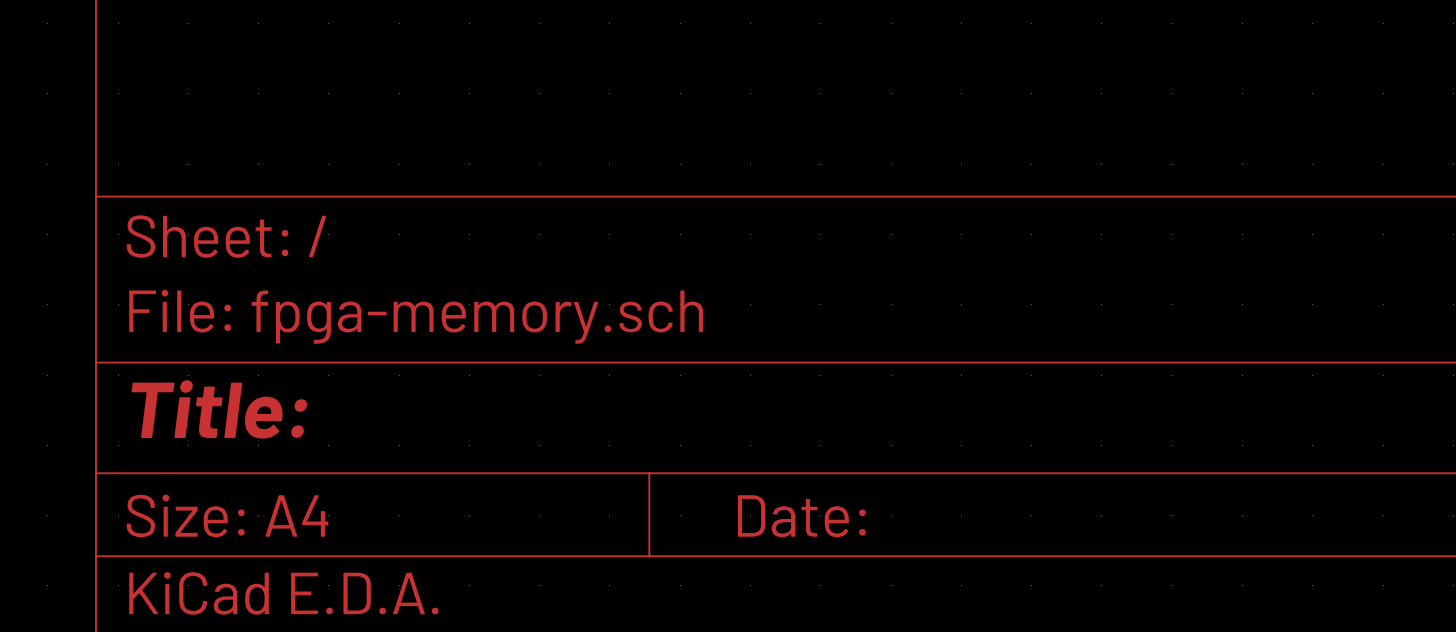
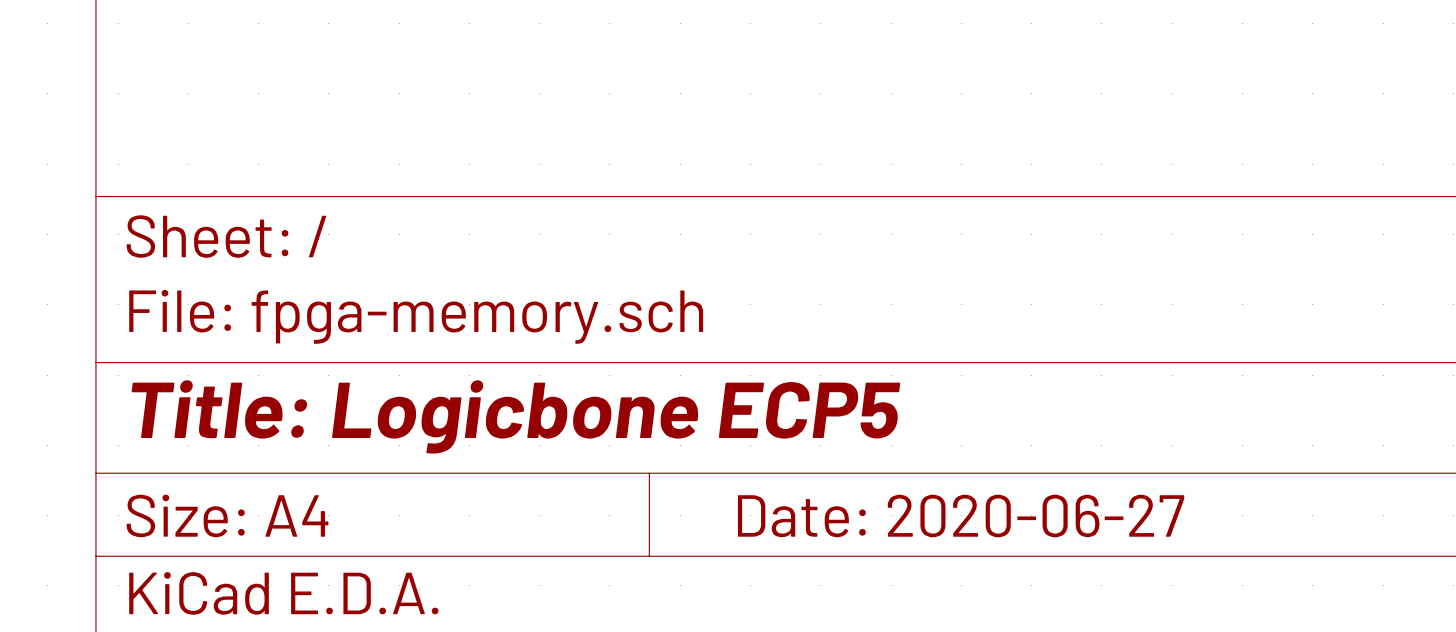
title block: Title: (219, 409) -> Title: Logicbone ECP5 (515, 416)
title block: Date: (801, 516) -> Date: 2020-06-27 (961, 515)

